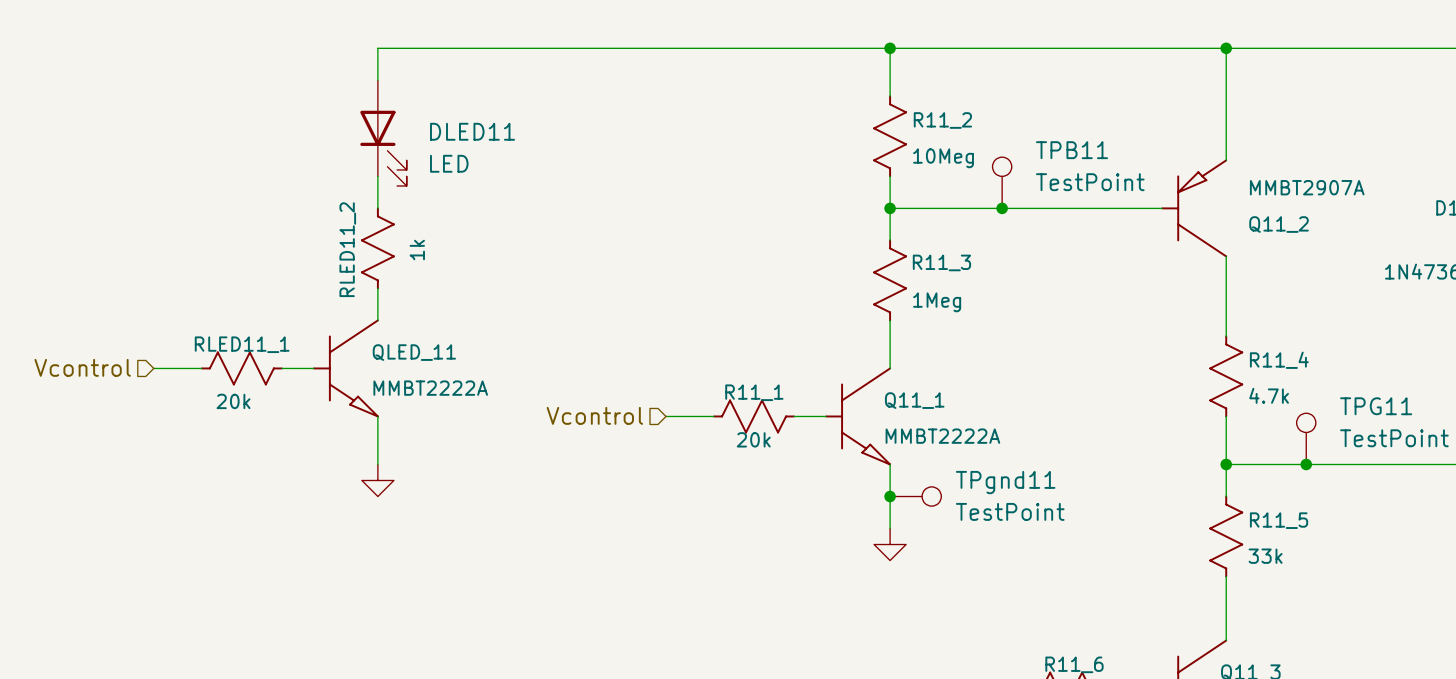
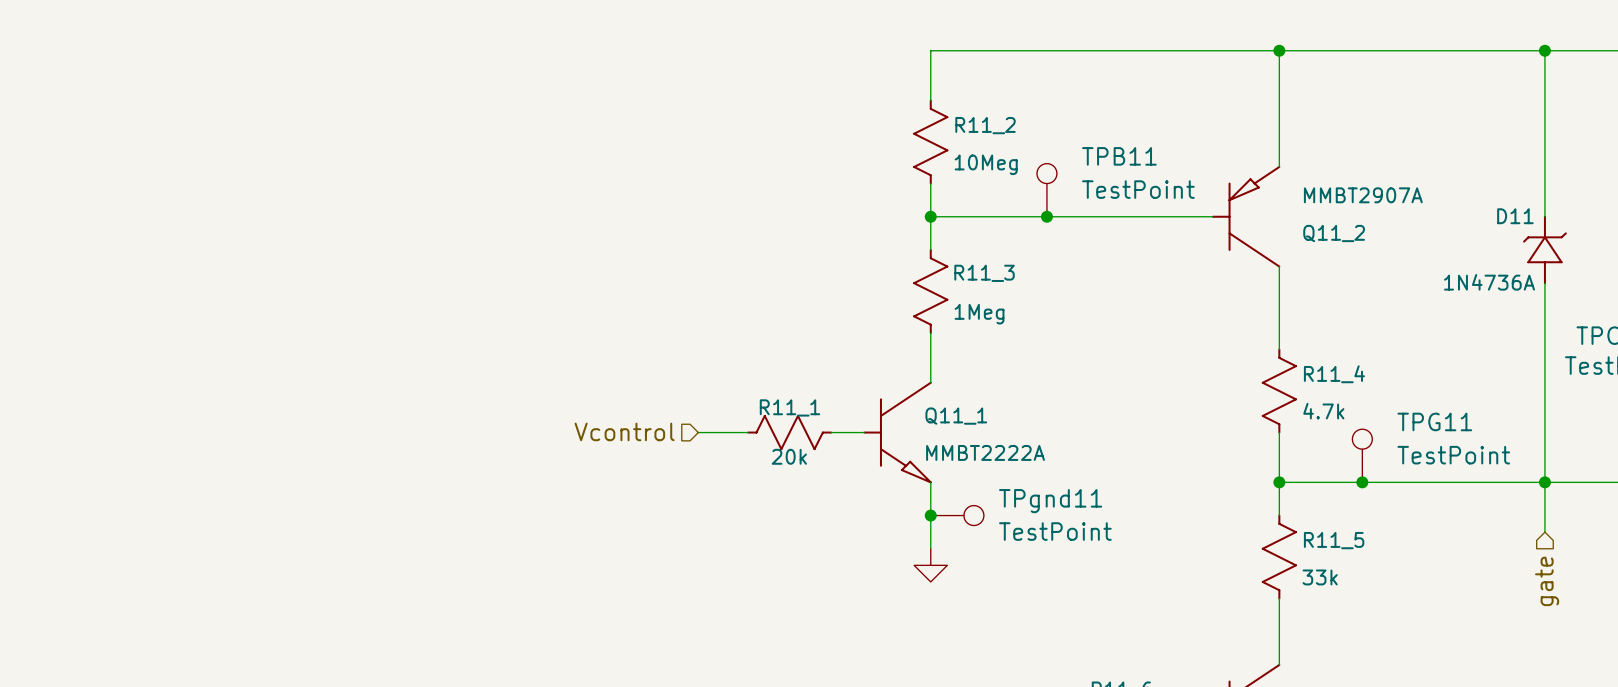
wire: (890, 48) (377, 48) (377, 80) -> none
junction: (890, 48) -> none
DLED11: LED (383, 133) -> none
wire: (377, 176) (377, 208) -> none
RLED11_2: 1k (377, 248) -> none
wire: (377, 288) (377, 320) -> none
hierarchical label: Vcontrol (82, 367) -> none
wire: (153, 368) (201, 368) -> none
RLED11_1: 20k (241, 368) -> none
wire: (281, 368) (313, 368) -> none
QLED_11: MMBT2222A (345, 368) -> none
wire: (377, 416) (377, 464) -> none
power symbol: (377, 480) -> none

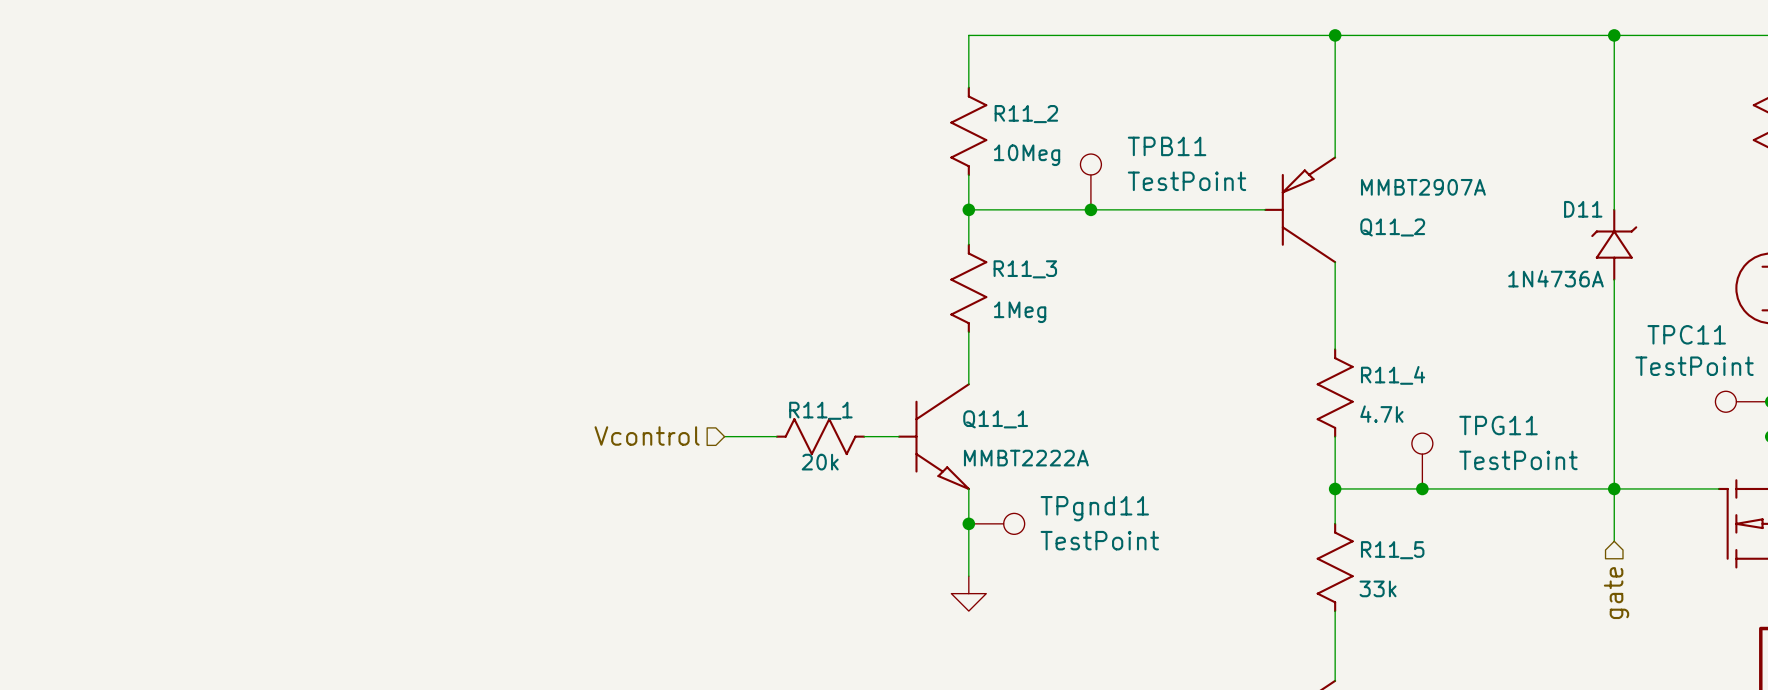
power symbol position: (930, 565) -> (968, 593)

